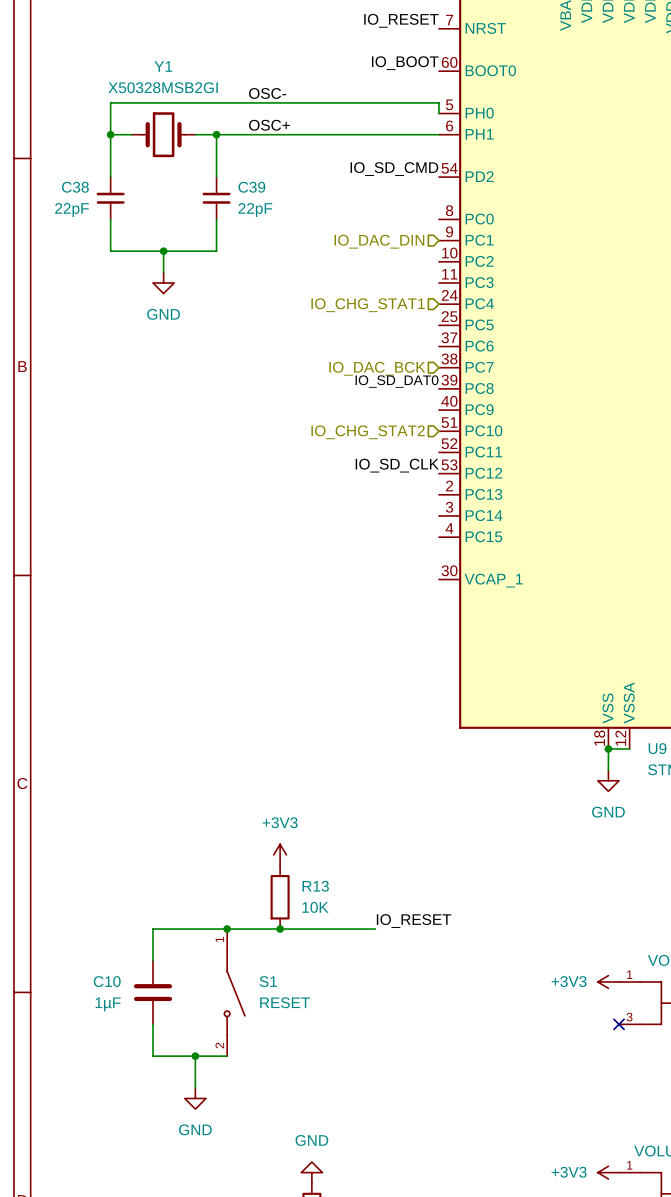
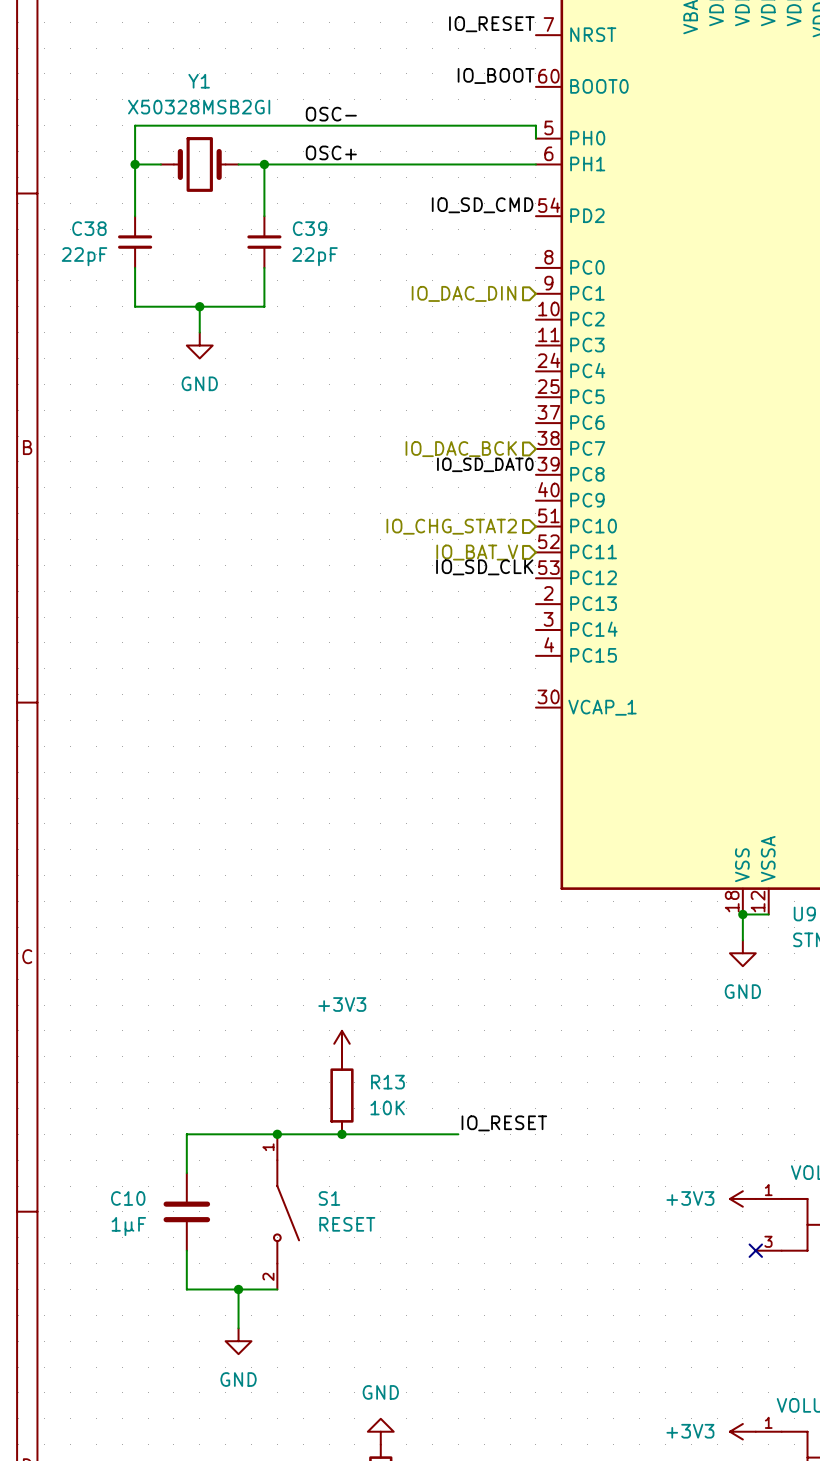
hierarchical label: IO_CHG_STAT1 (368, 305) -> none
hierarchical label: none -> IO_BAT_V (477, 552)

